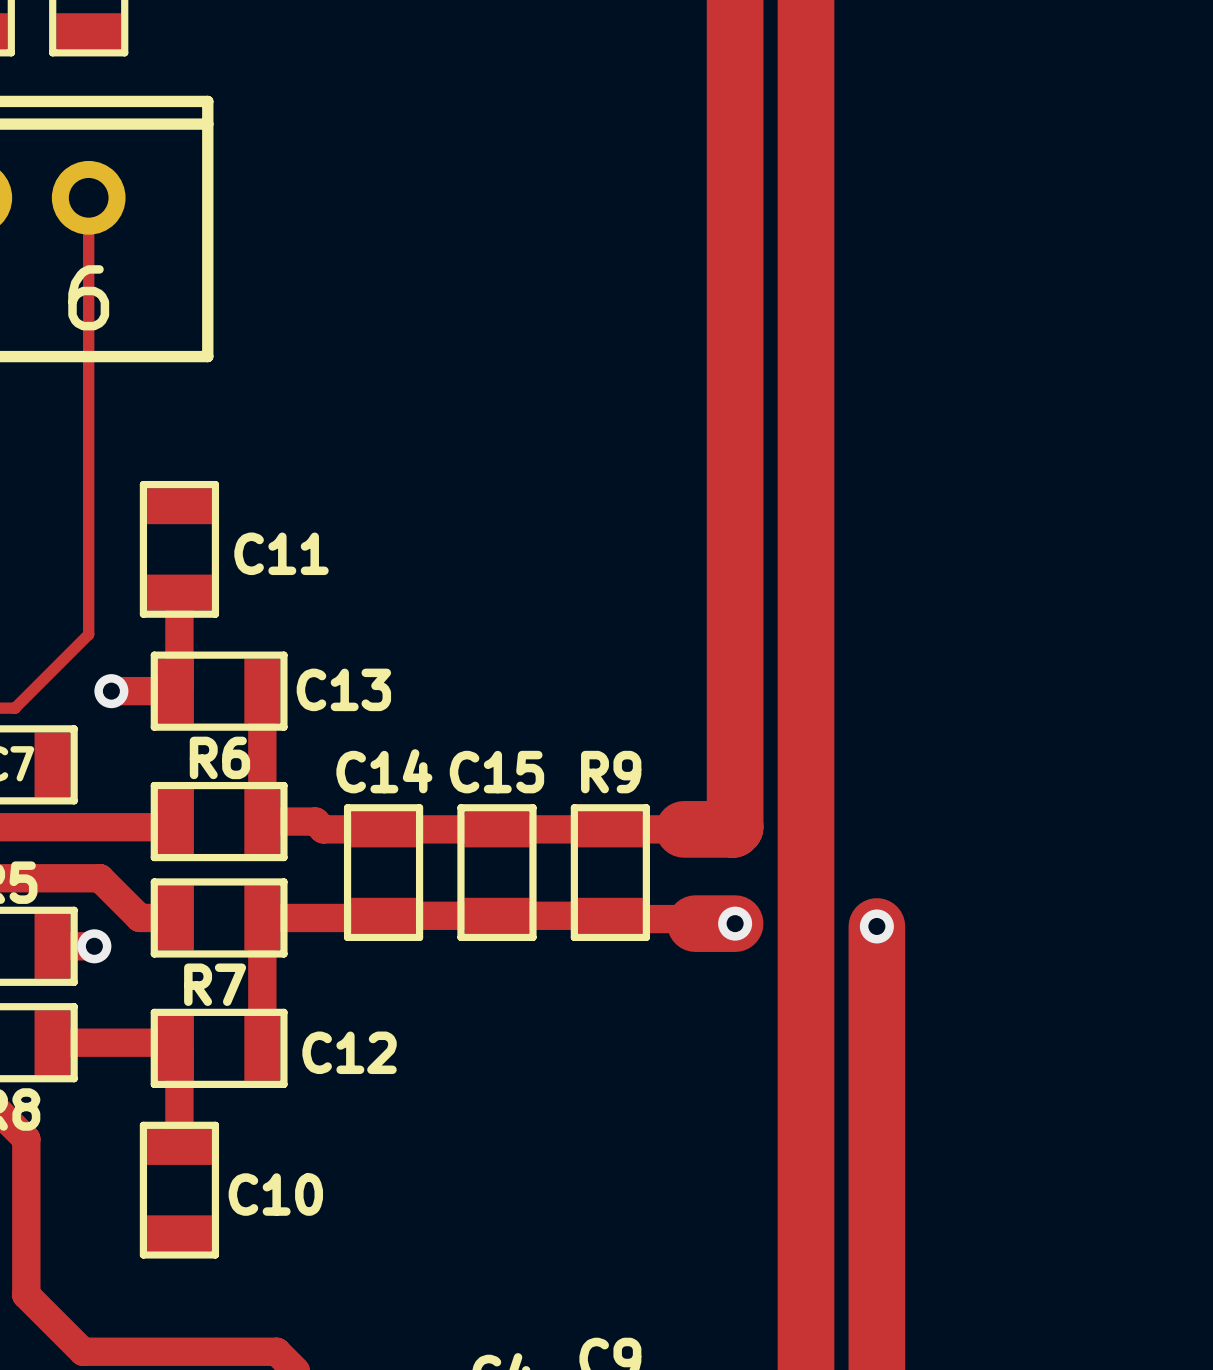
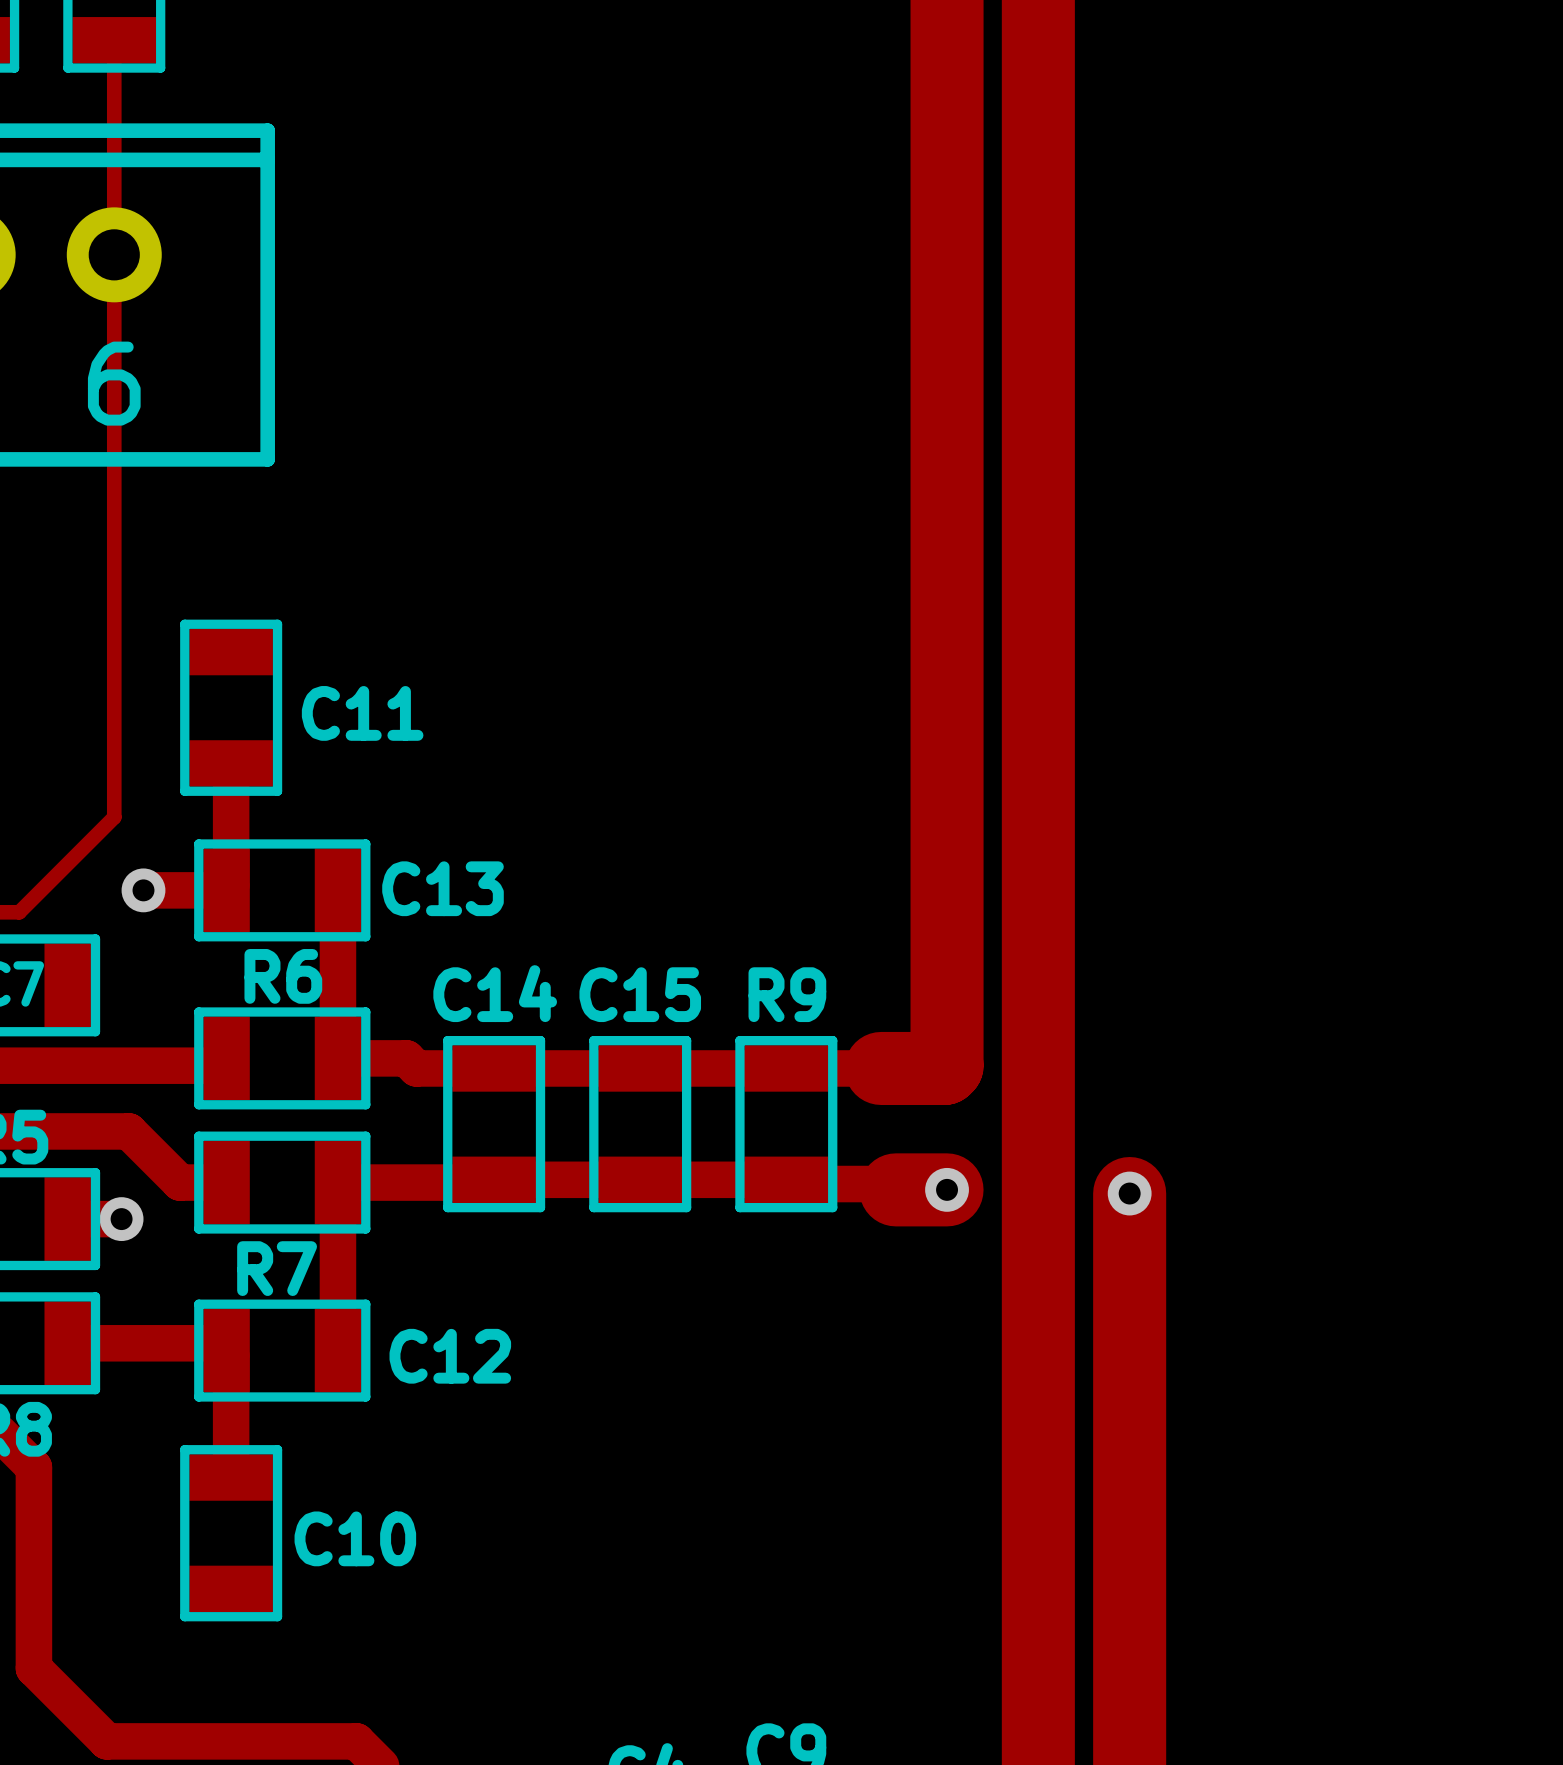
track: none -> (114, 40) (114, 254)

